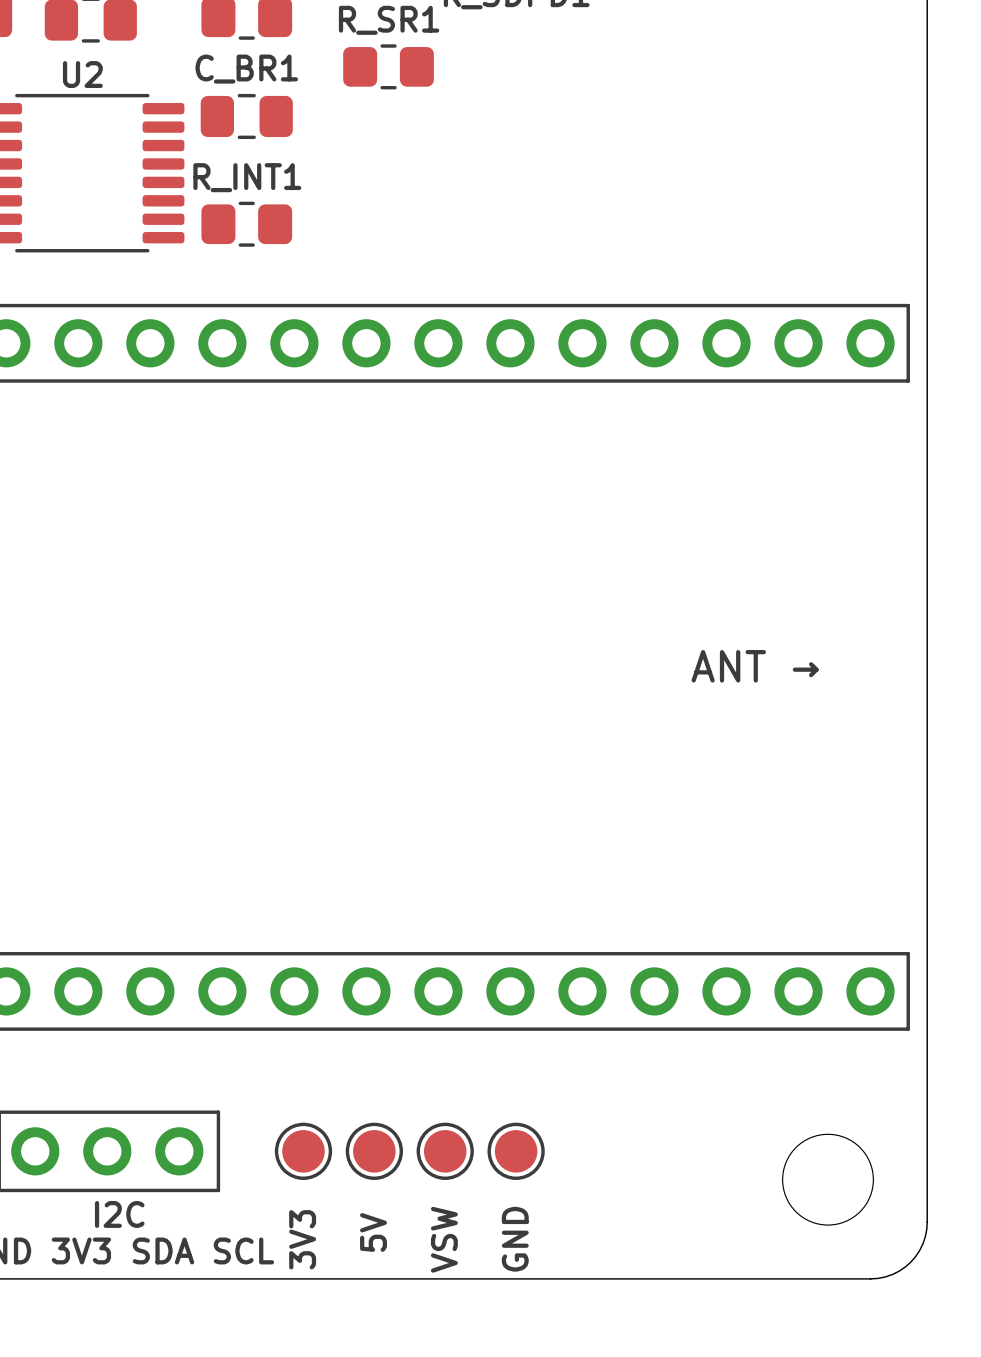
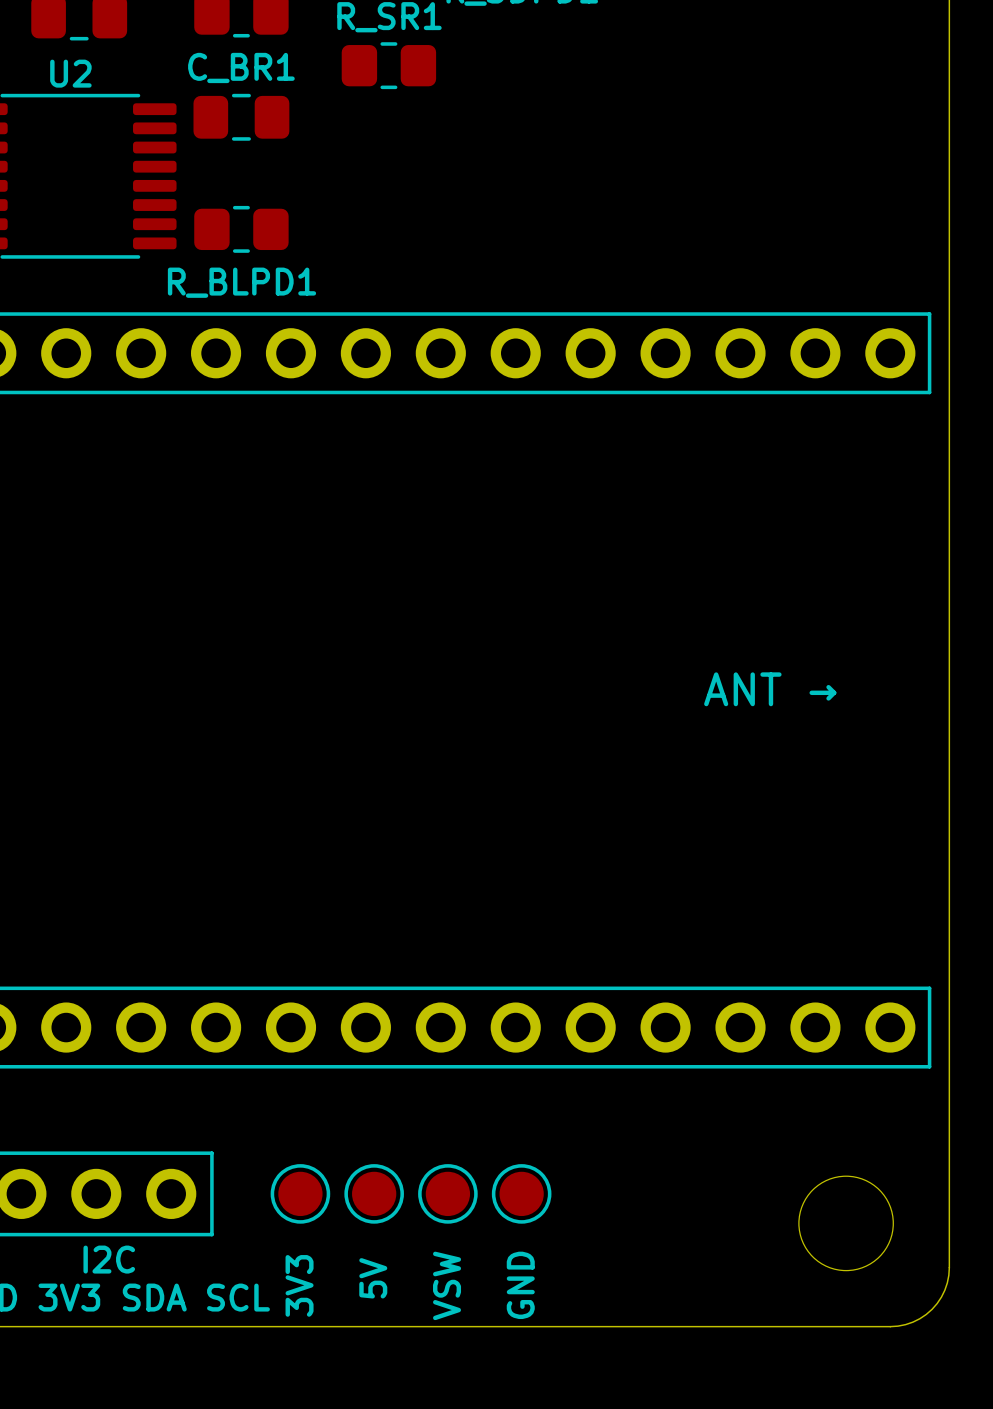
R_INT1 name: R_INT1 (247, 177) -> R_BLPD1 (241, 282)

